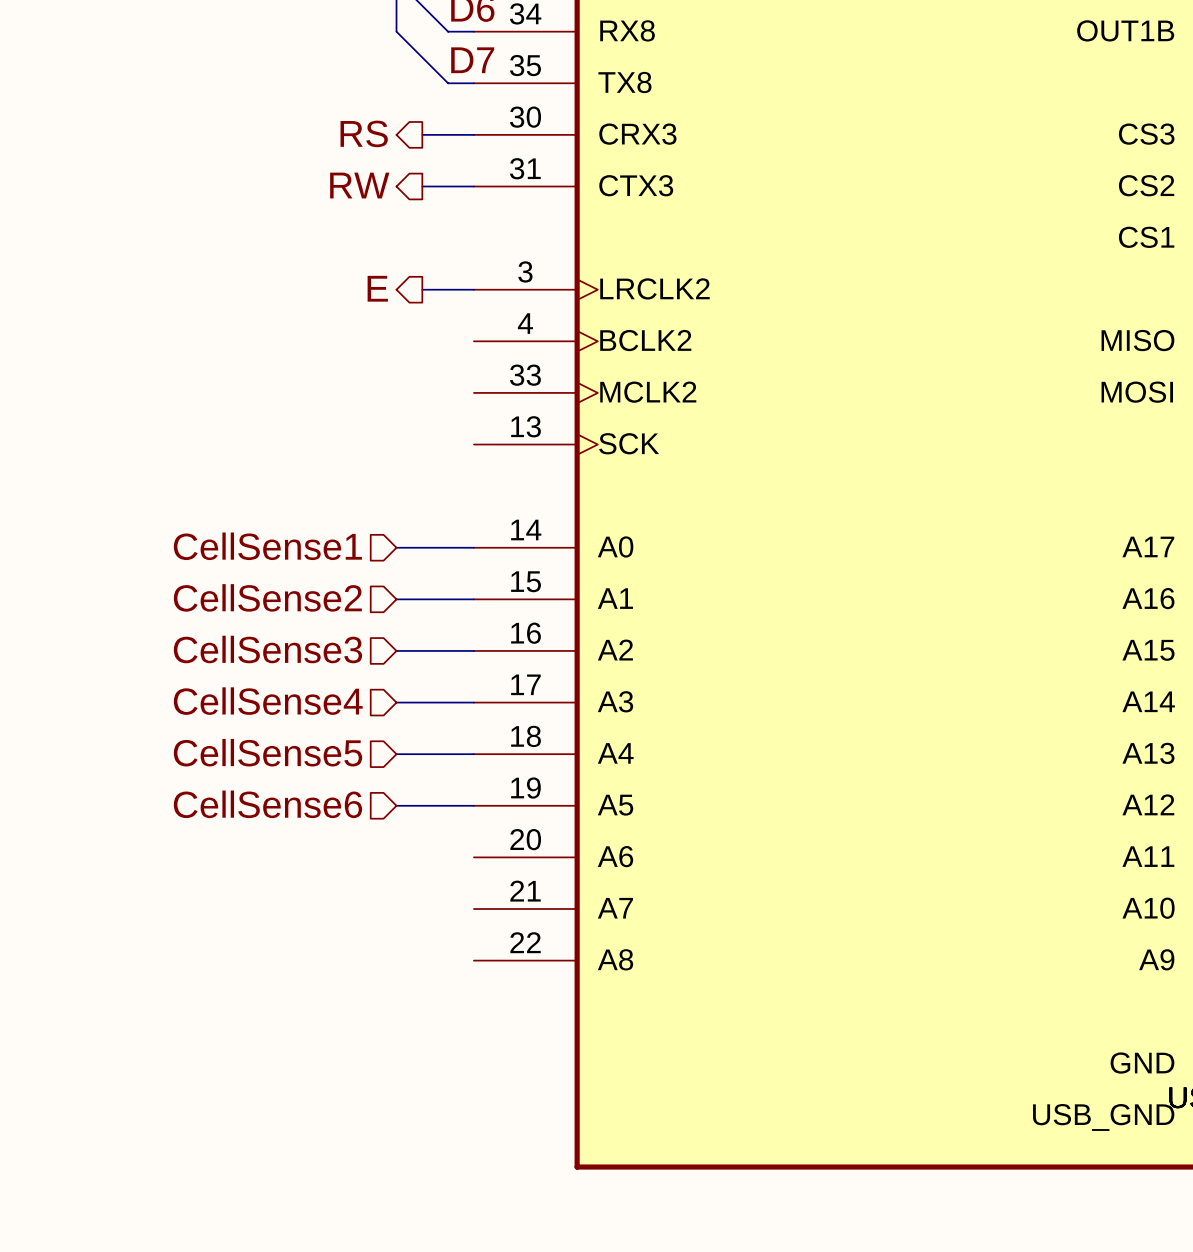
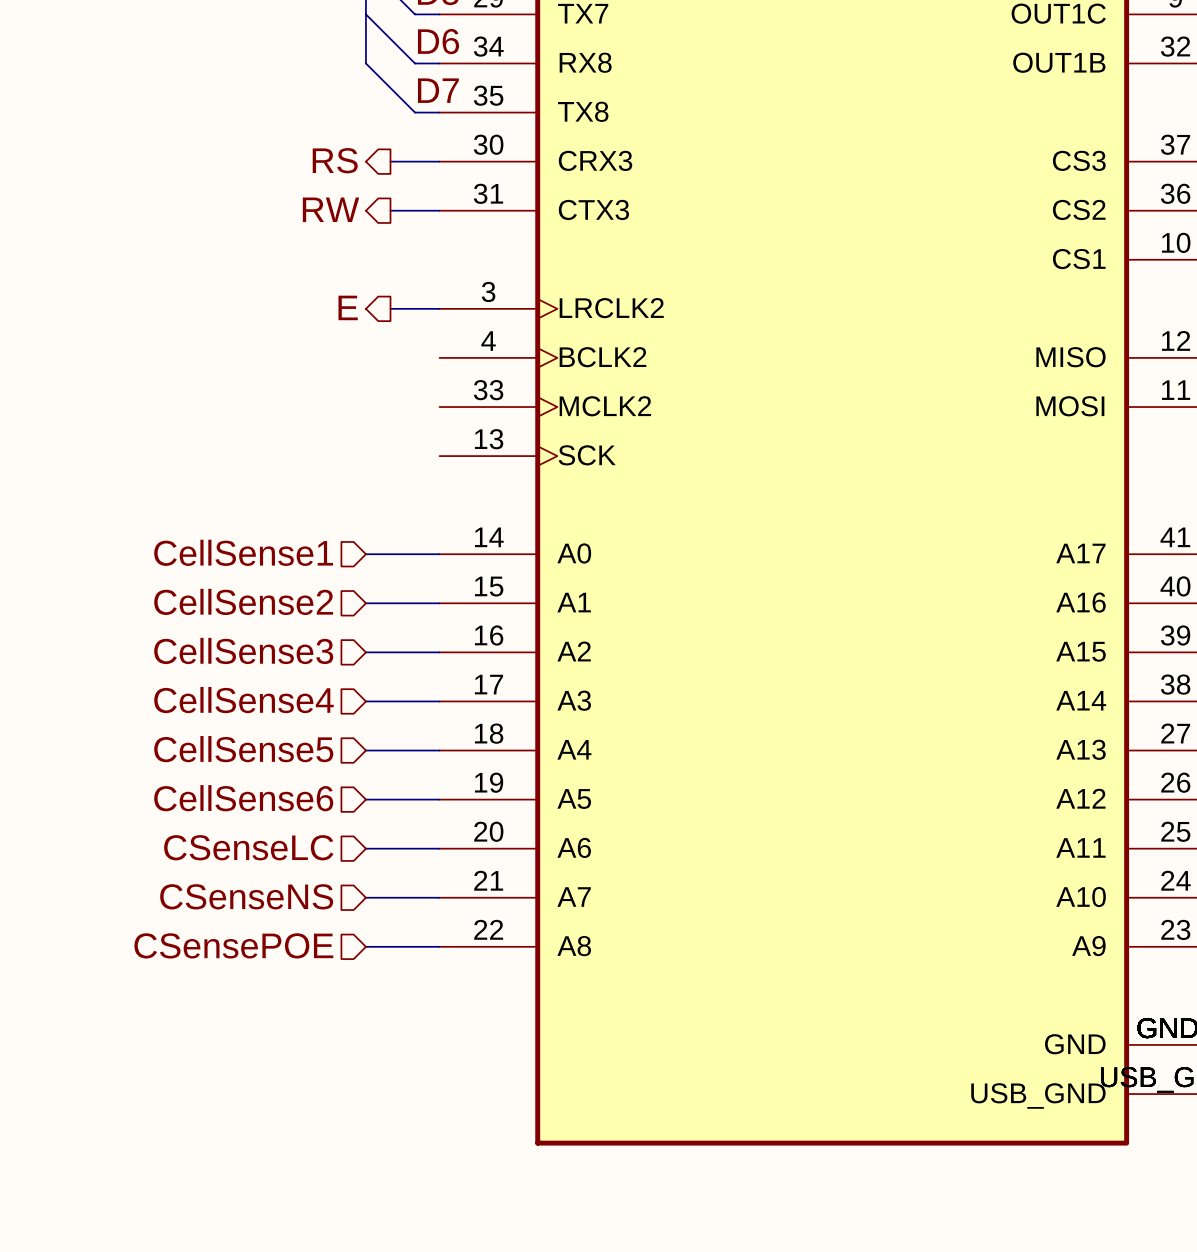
hierarchical label: none -> CSenseLC (248, 847)
wire: none -> (365, 848) (439, 848)
hierarchical label: none -> CSenseNS (246, 896)
wire: none -> (365, 897) (439, 897)
hierarchical label: none -> CSensePOE (233, 945)
wire: none -> (365, 946) (439, 946)

